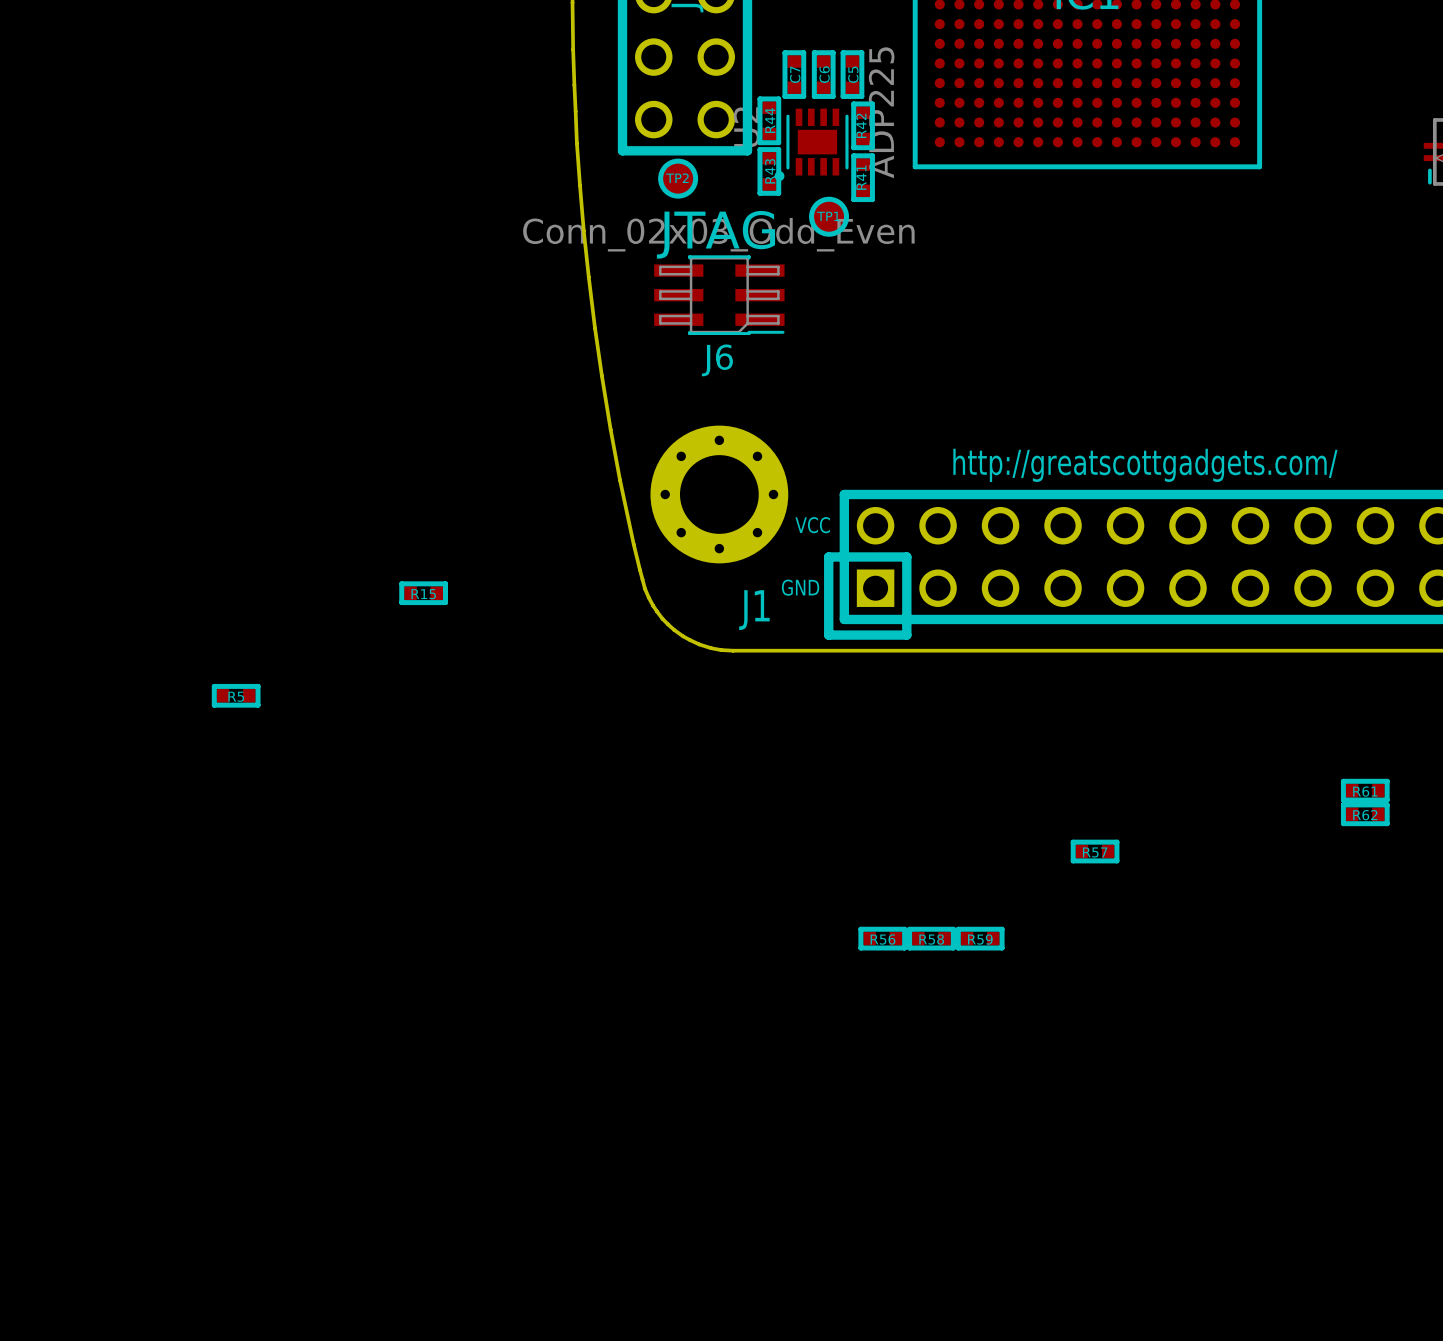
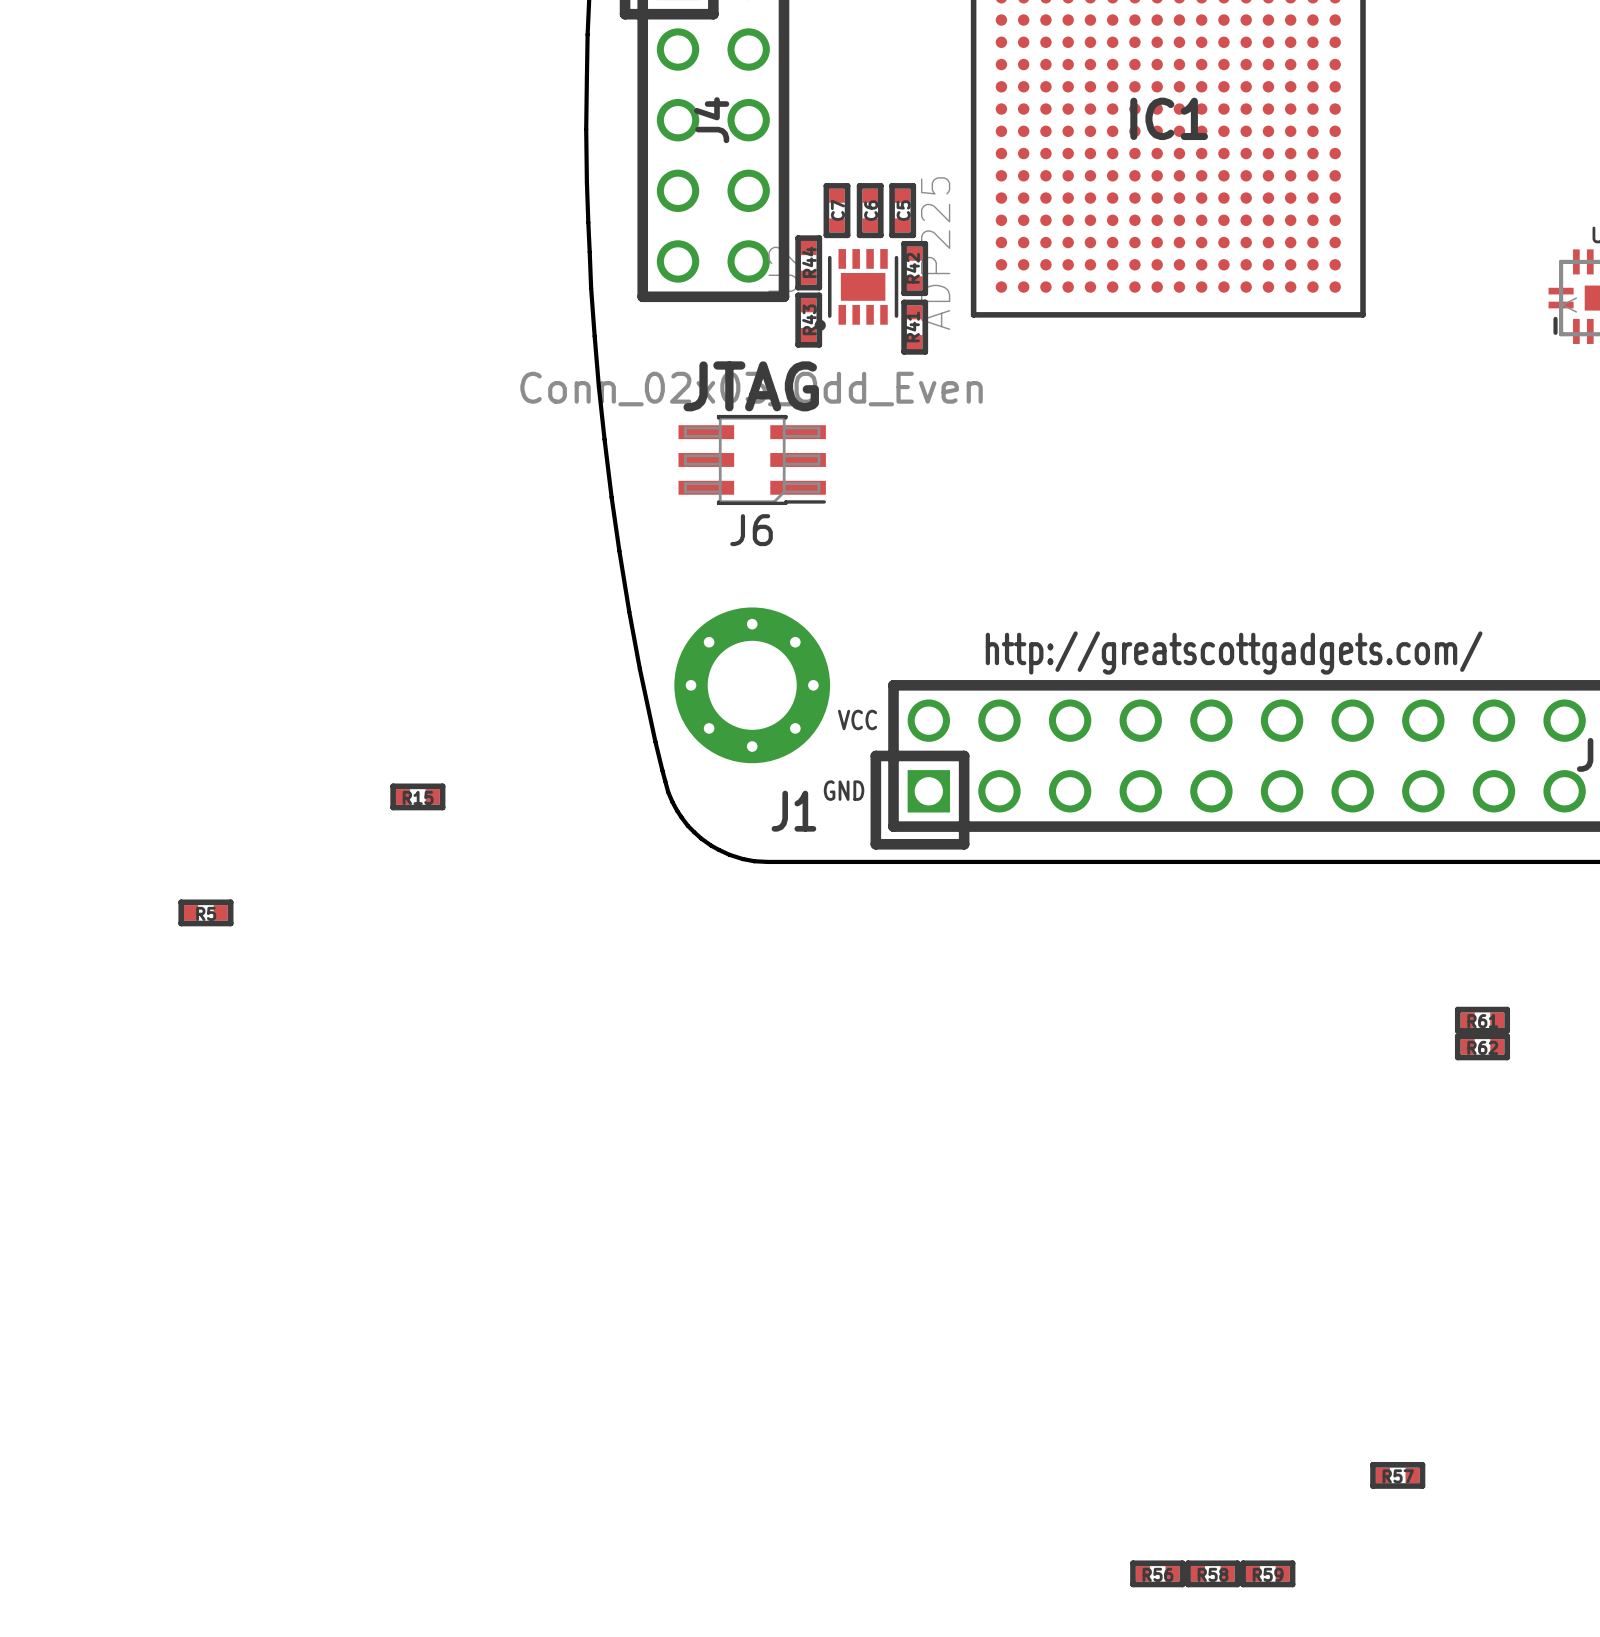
TP2: (678, 178) -> none
TP1: (829, 216) -> none
R57 position: (1095, 851) -> (1397, 1475)
R56 position: (882, 938) -> (1157, 1573)
R58 position: (931, 938) -> (1212, 1573)
R59 position: (980, 938) -> (1267, 1573)

